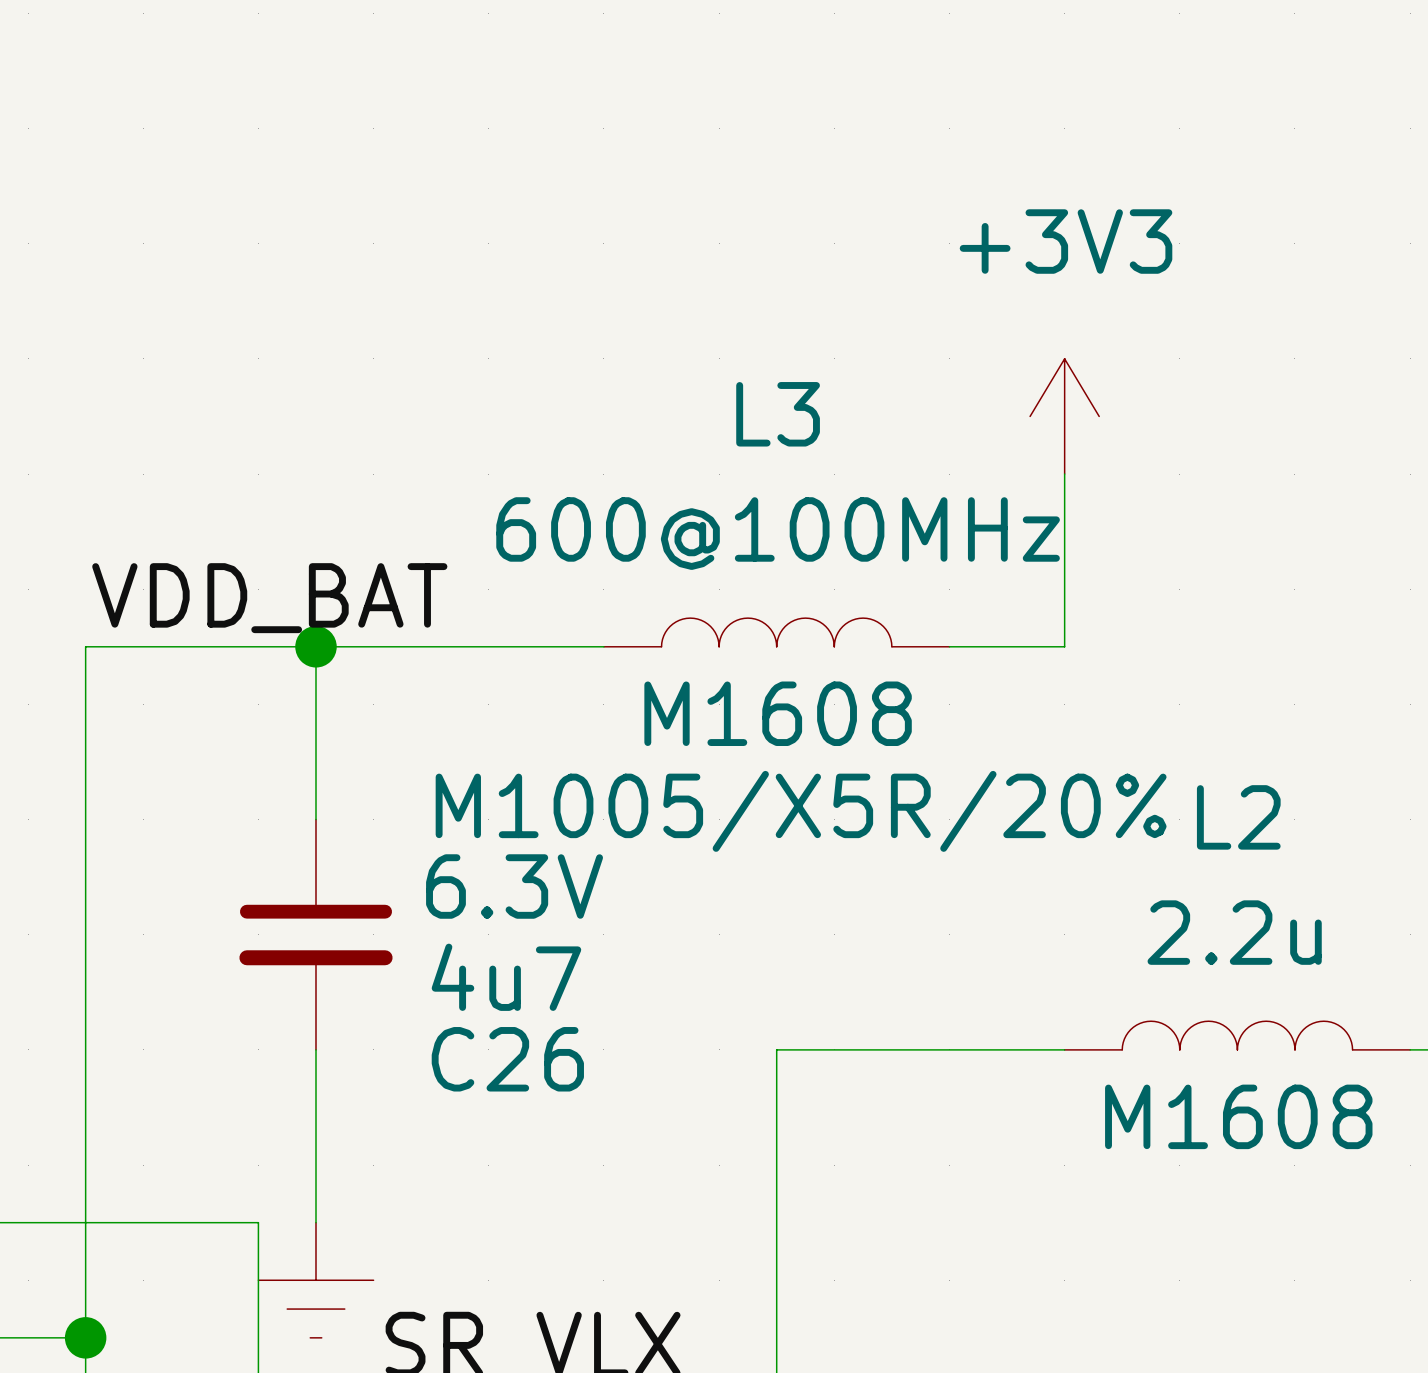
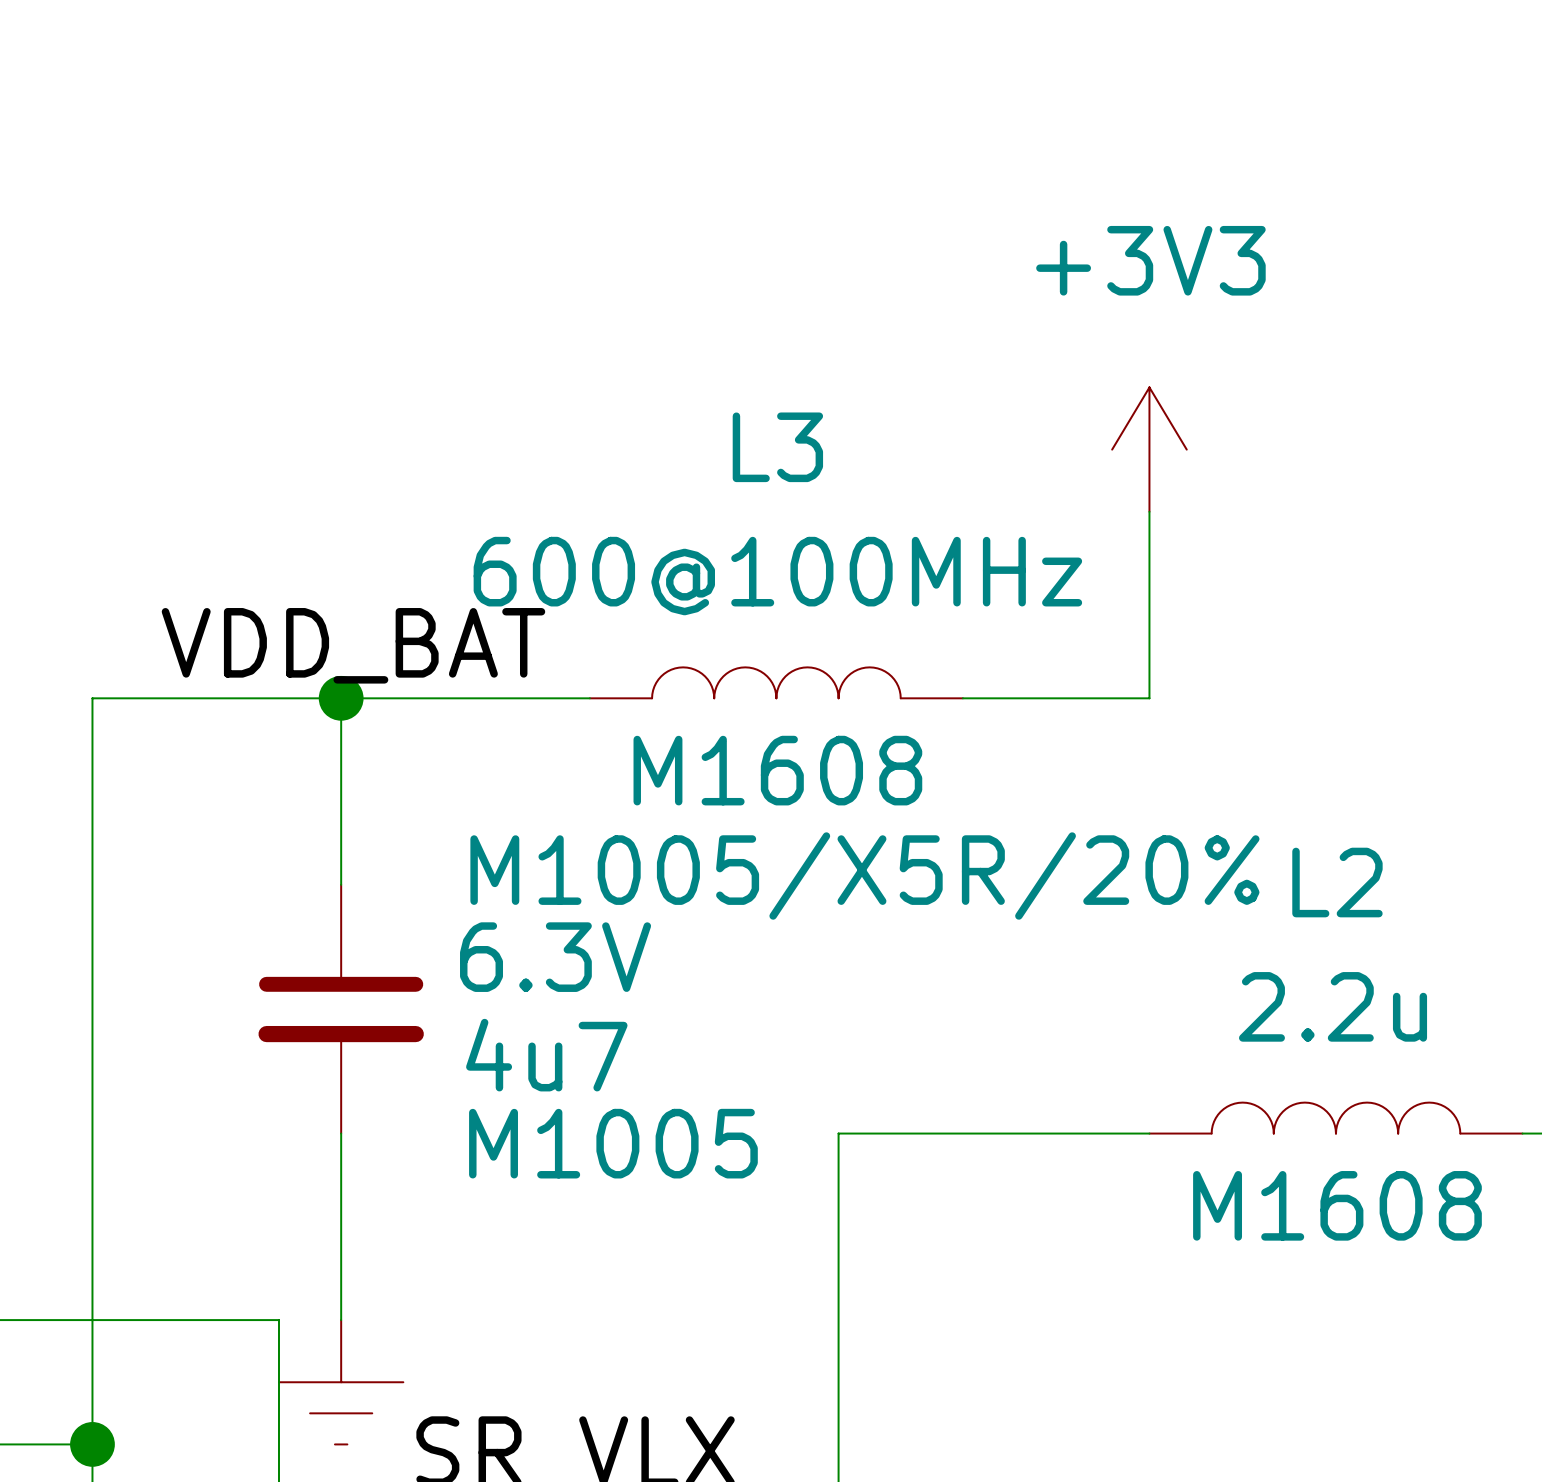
label position: VDD_BAT (269, 598) -> VDD_BAT (353, 645)
L3 position: (776, 632) -> (776, 682)
C26 name: C26 (507, 1059) -> M1005 (613, 1143)

